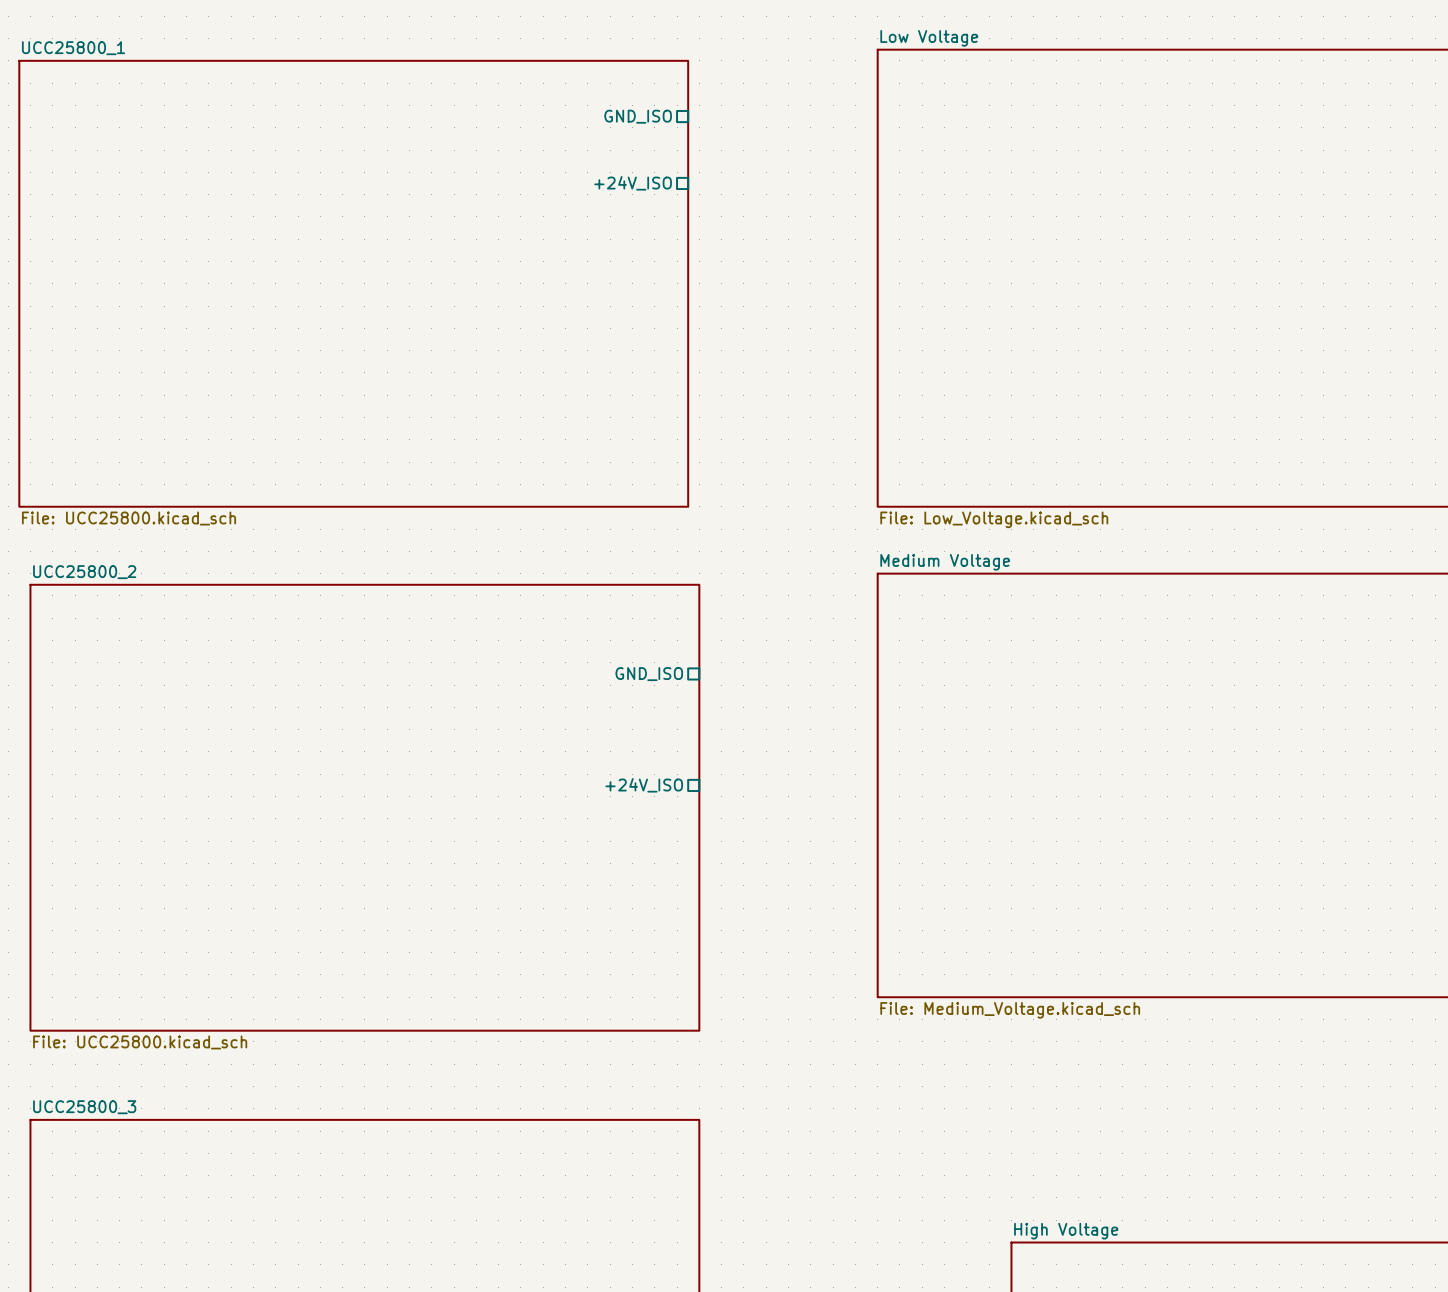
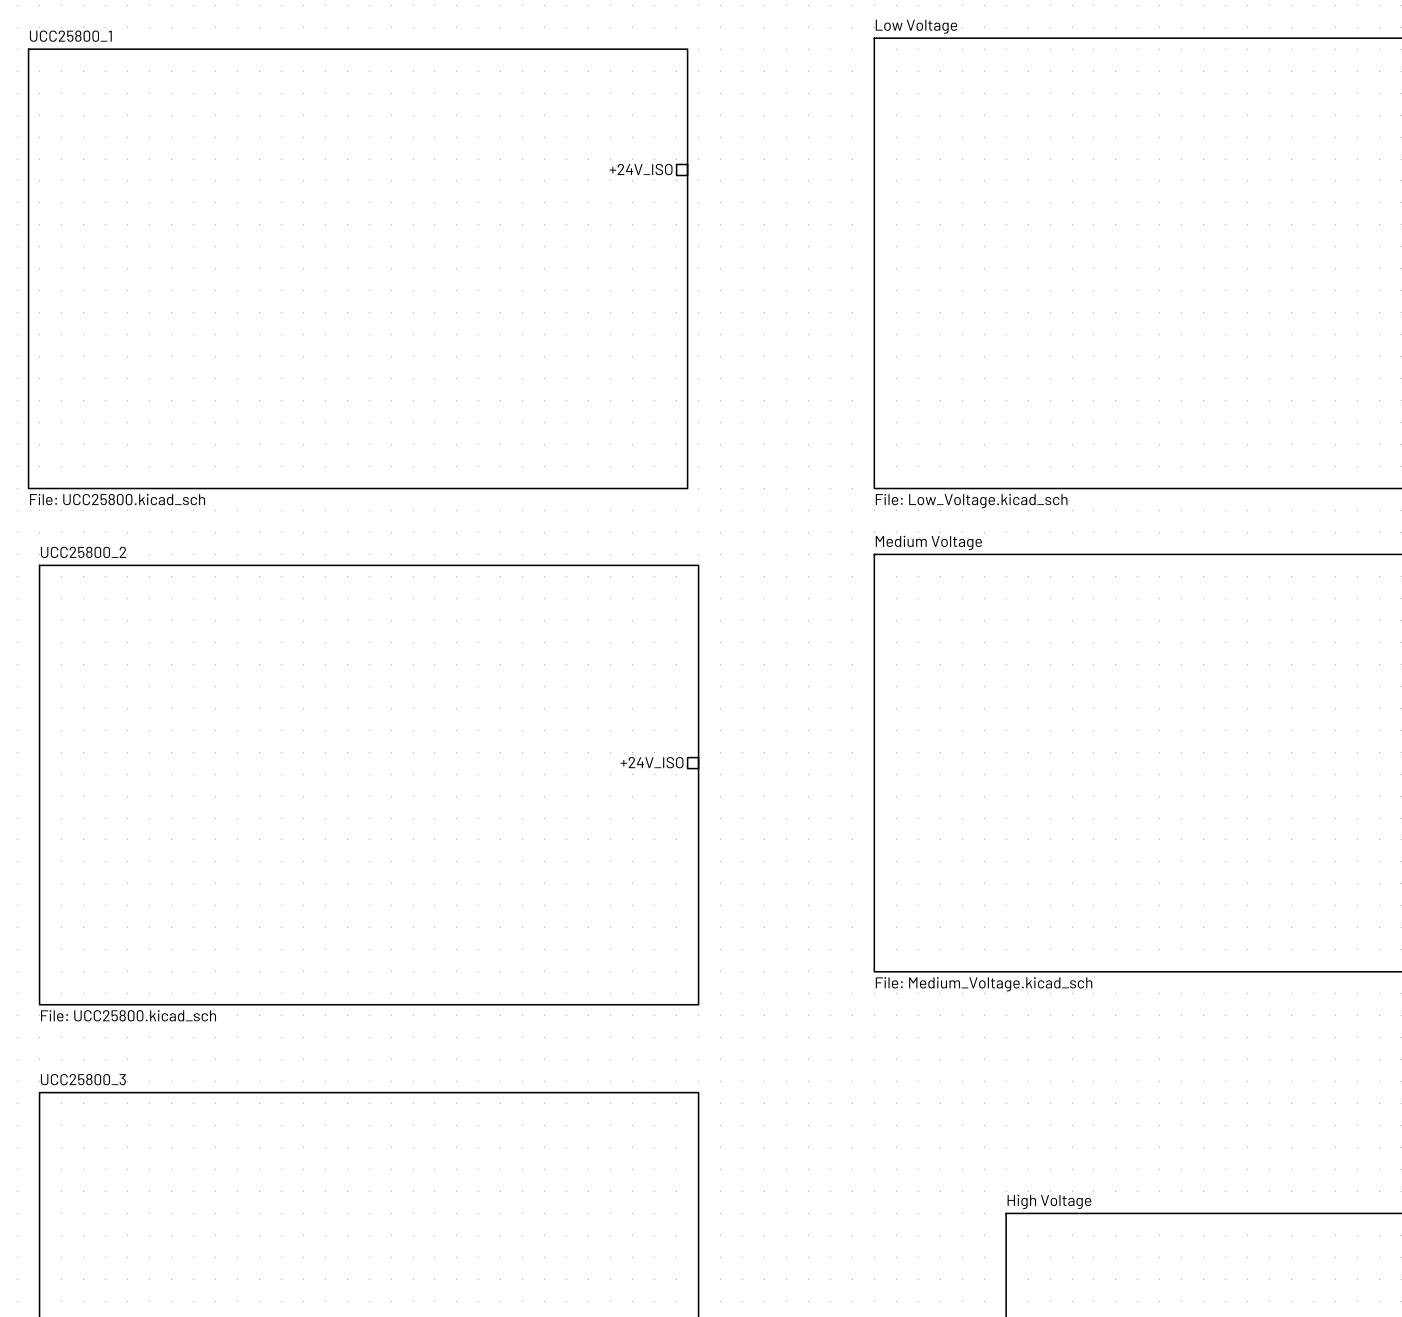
sheet pin: GND_ISO (638, 116) -> none
sheet pin: GND_ISO (649, 674) -> none

